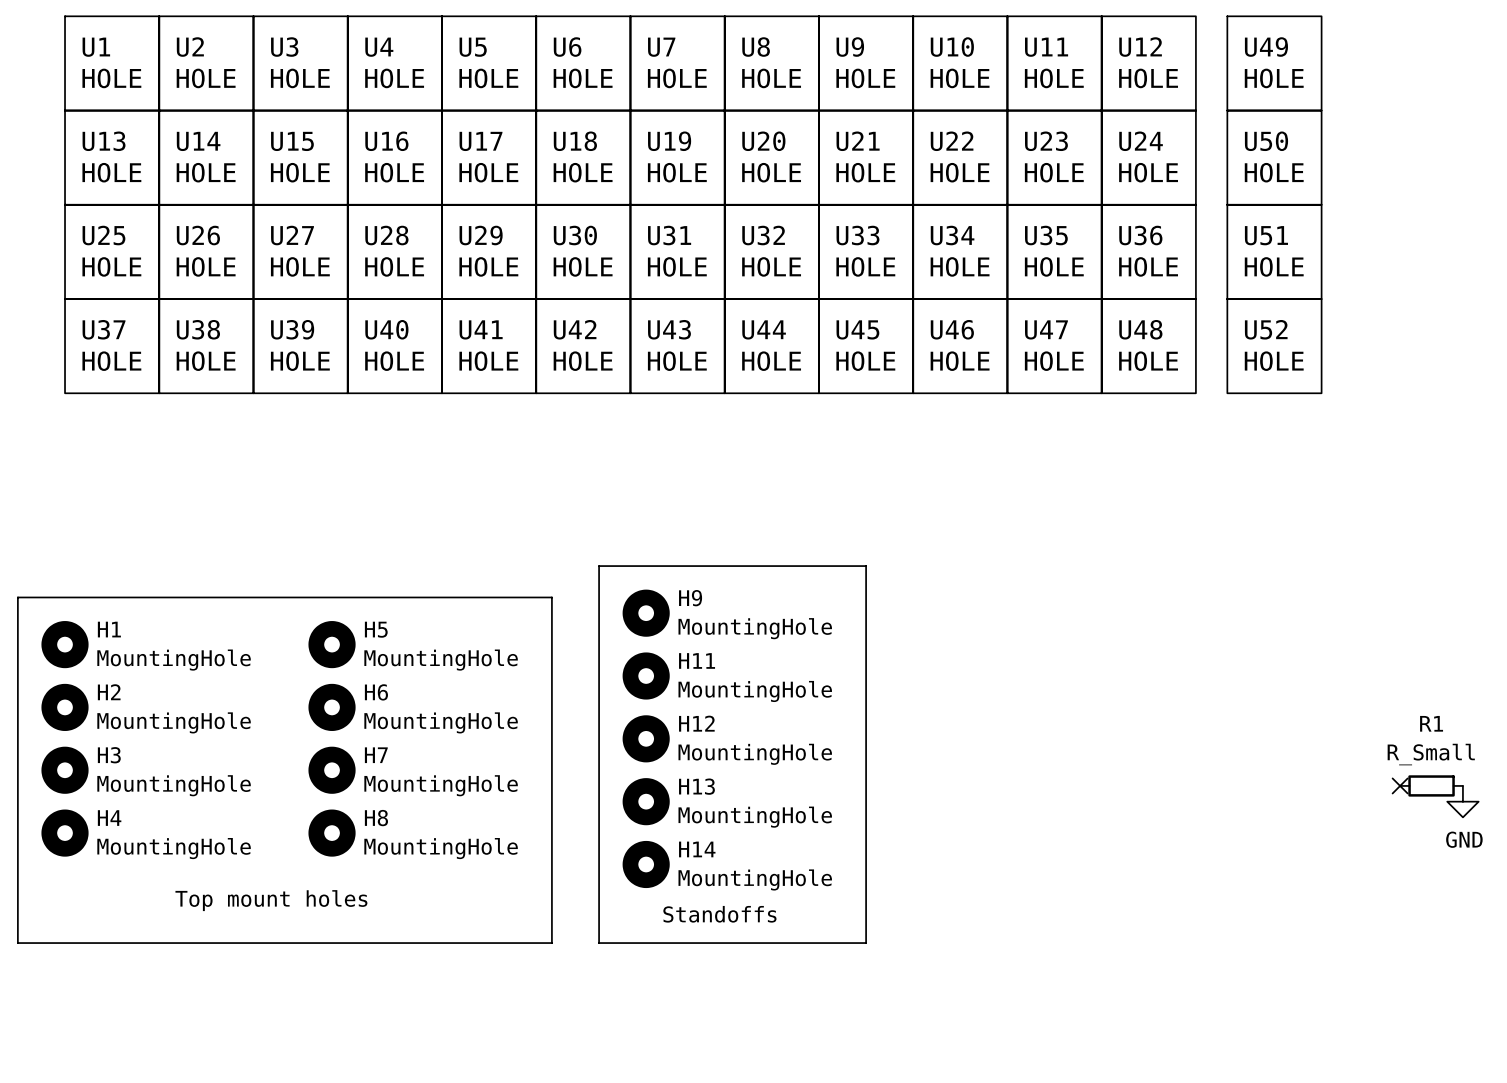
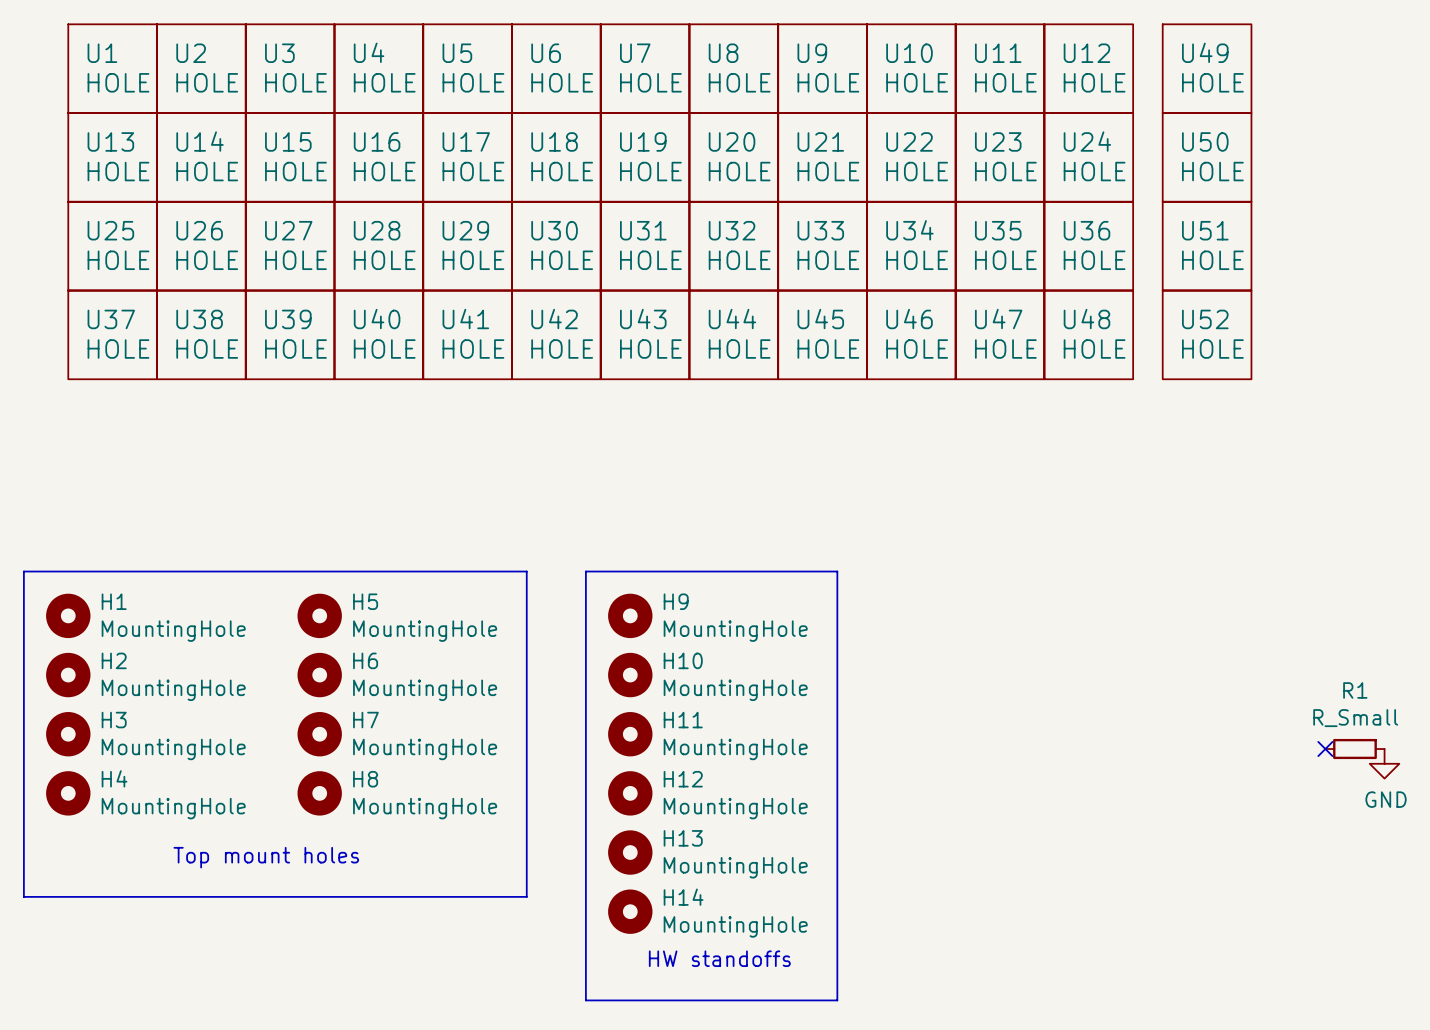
line: (599, 566) (599, 943) (866, 943) (866, 566) (599, 566) -> (585, 571) (585, 1000) (837, 1000) (837, 571) (585, 571)
H9 position: (646, 613) -> (630, 615)
H11 position: (646, 676) -> (630, 734)
H10: none -> MountingHole (630, 675)
H12 position: (646, 738) -> (630, 793)
H13 position: (646, 801) -> (630, 852)
H14 position: (646, 864) -> (630, 911)
text: Standoffs (719, 914) -> none
text: none -> HW standoffs (719, 958)

